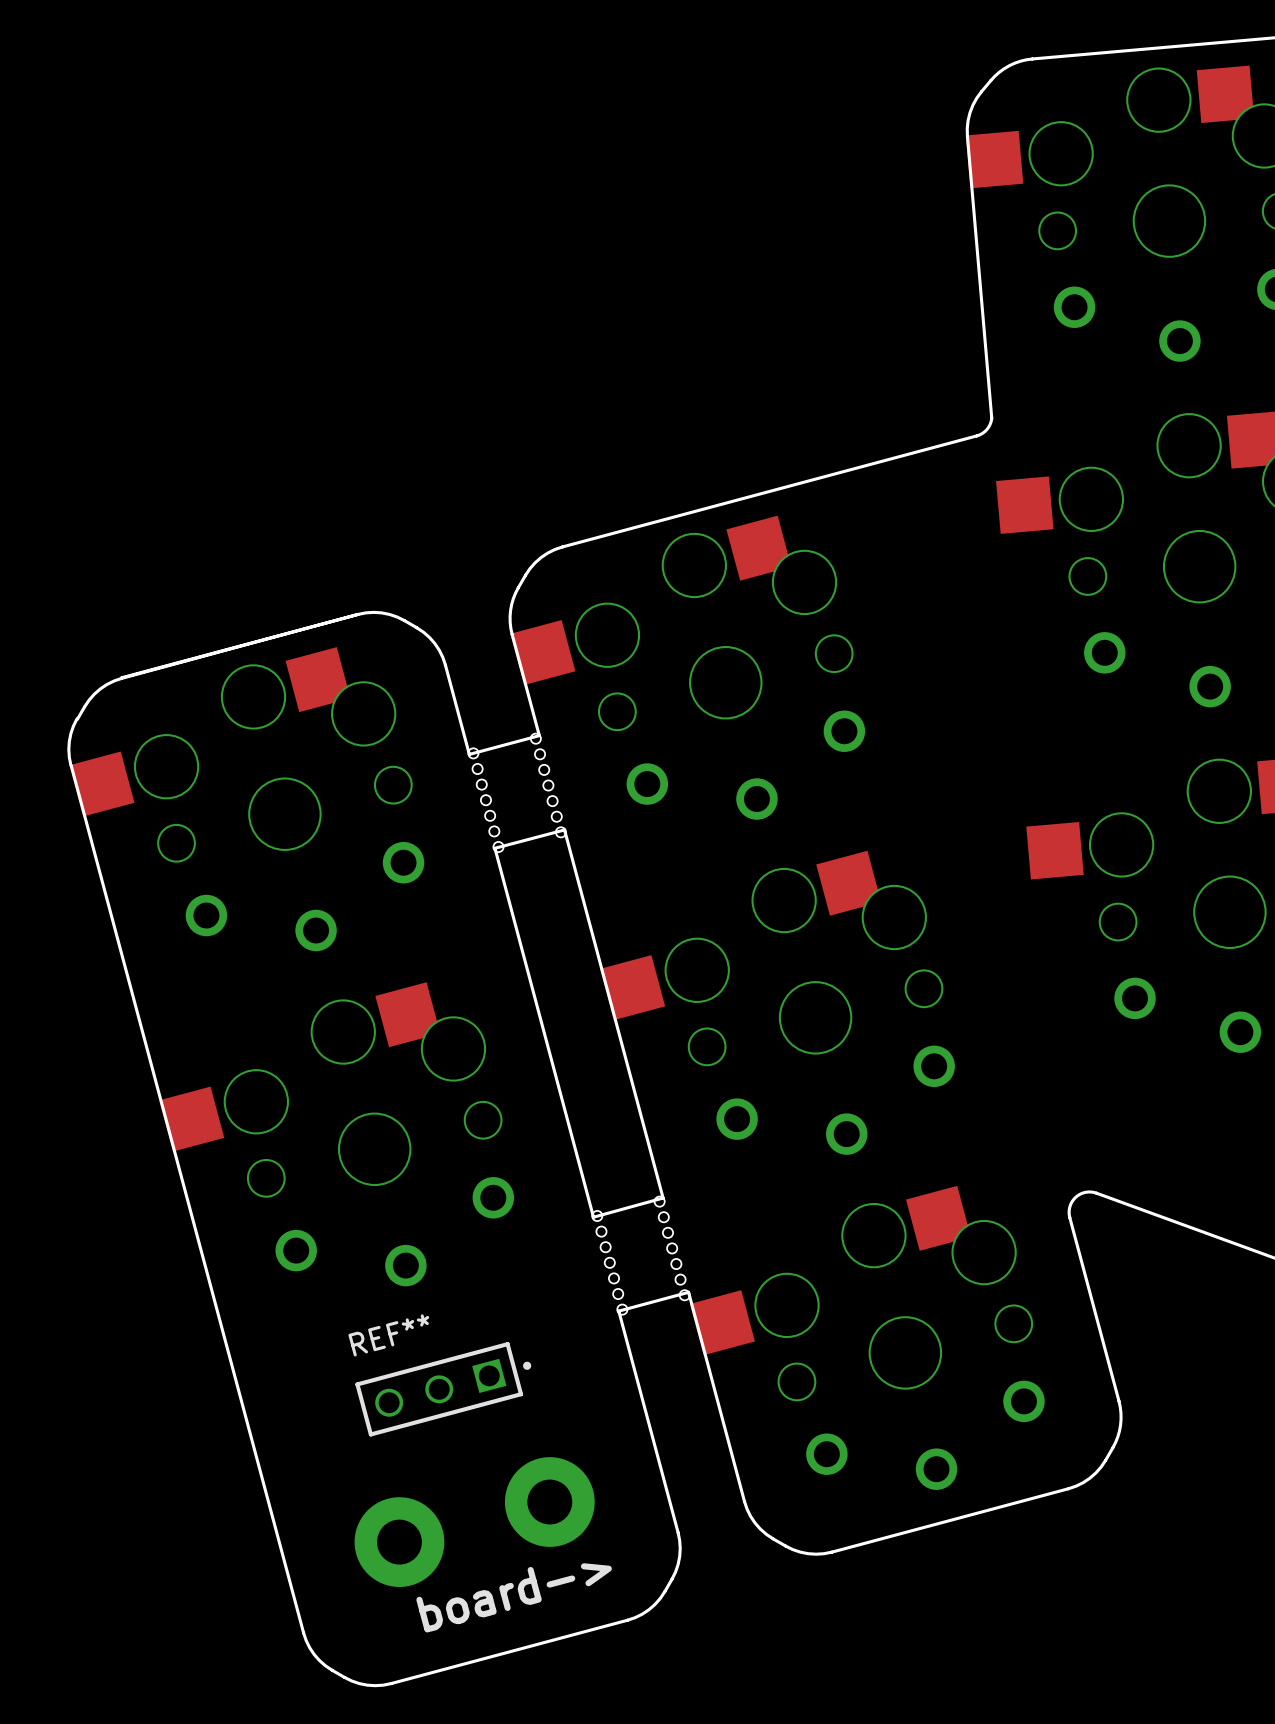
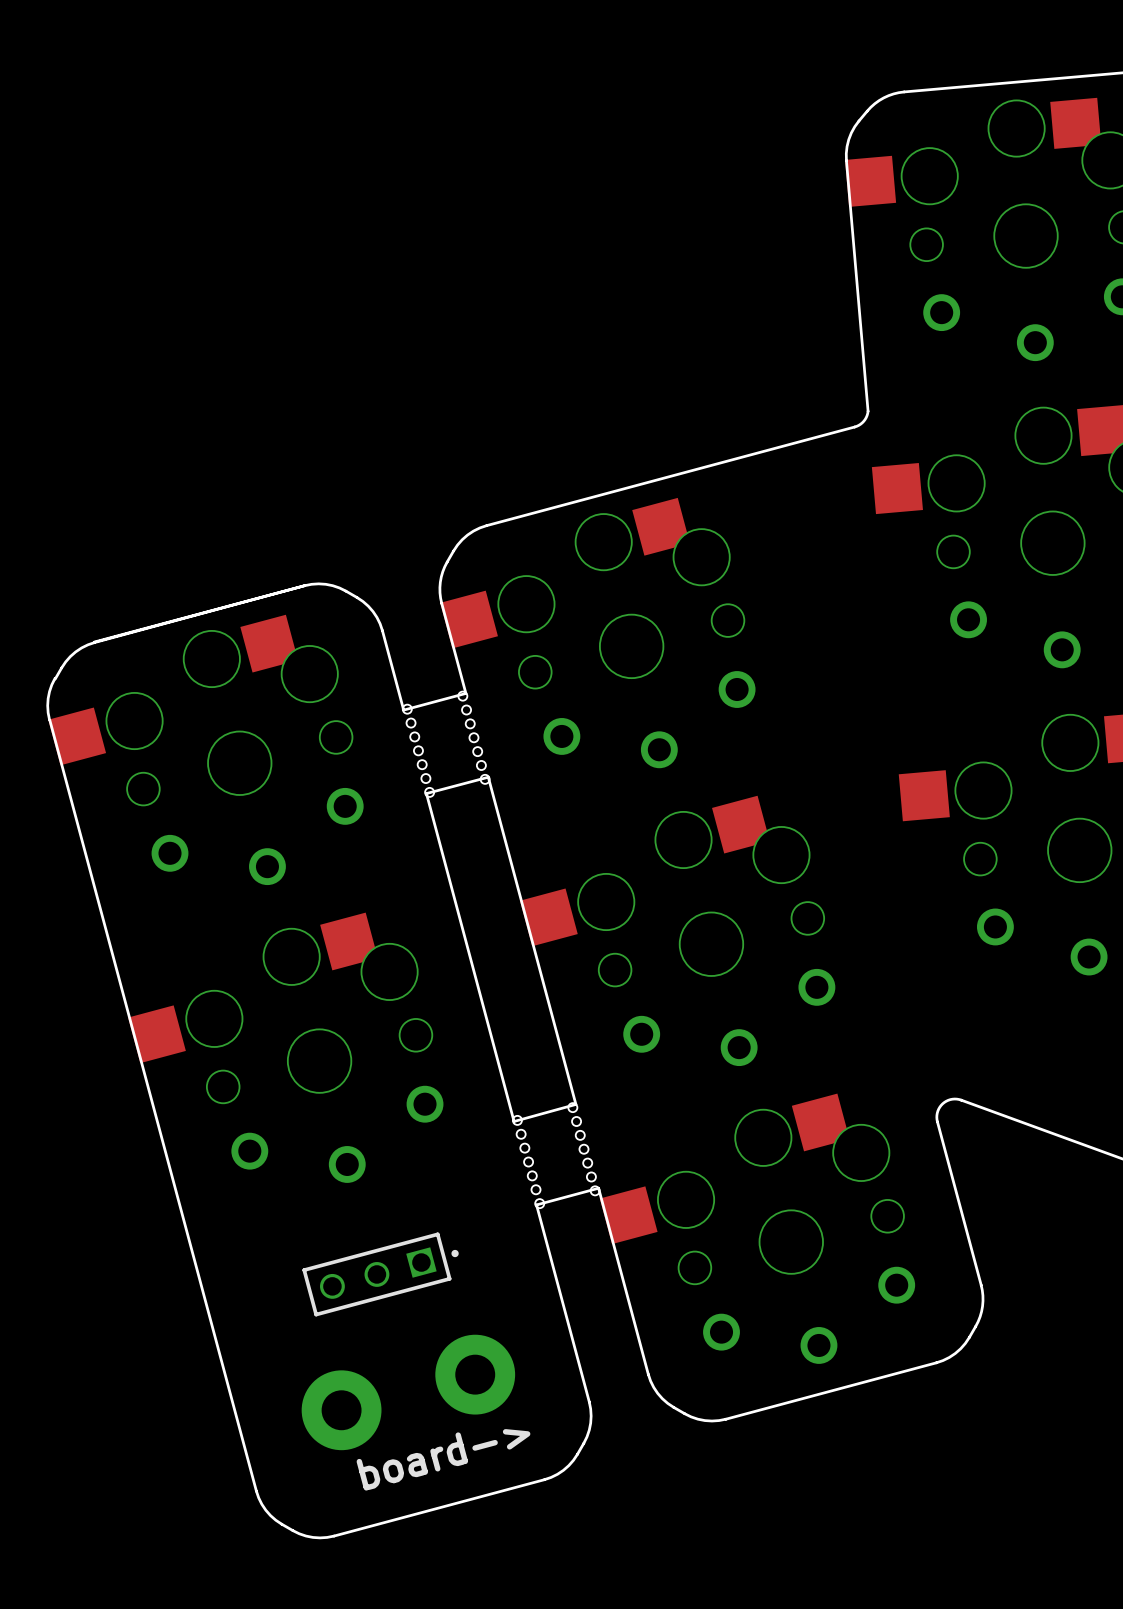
REF** name: REF** (388, 1335) -> none

